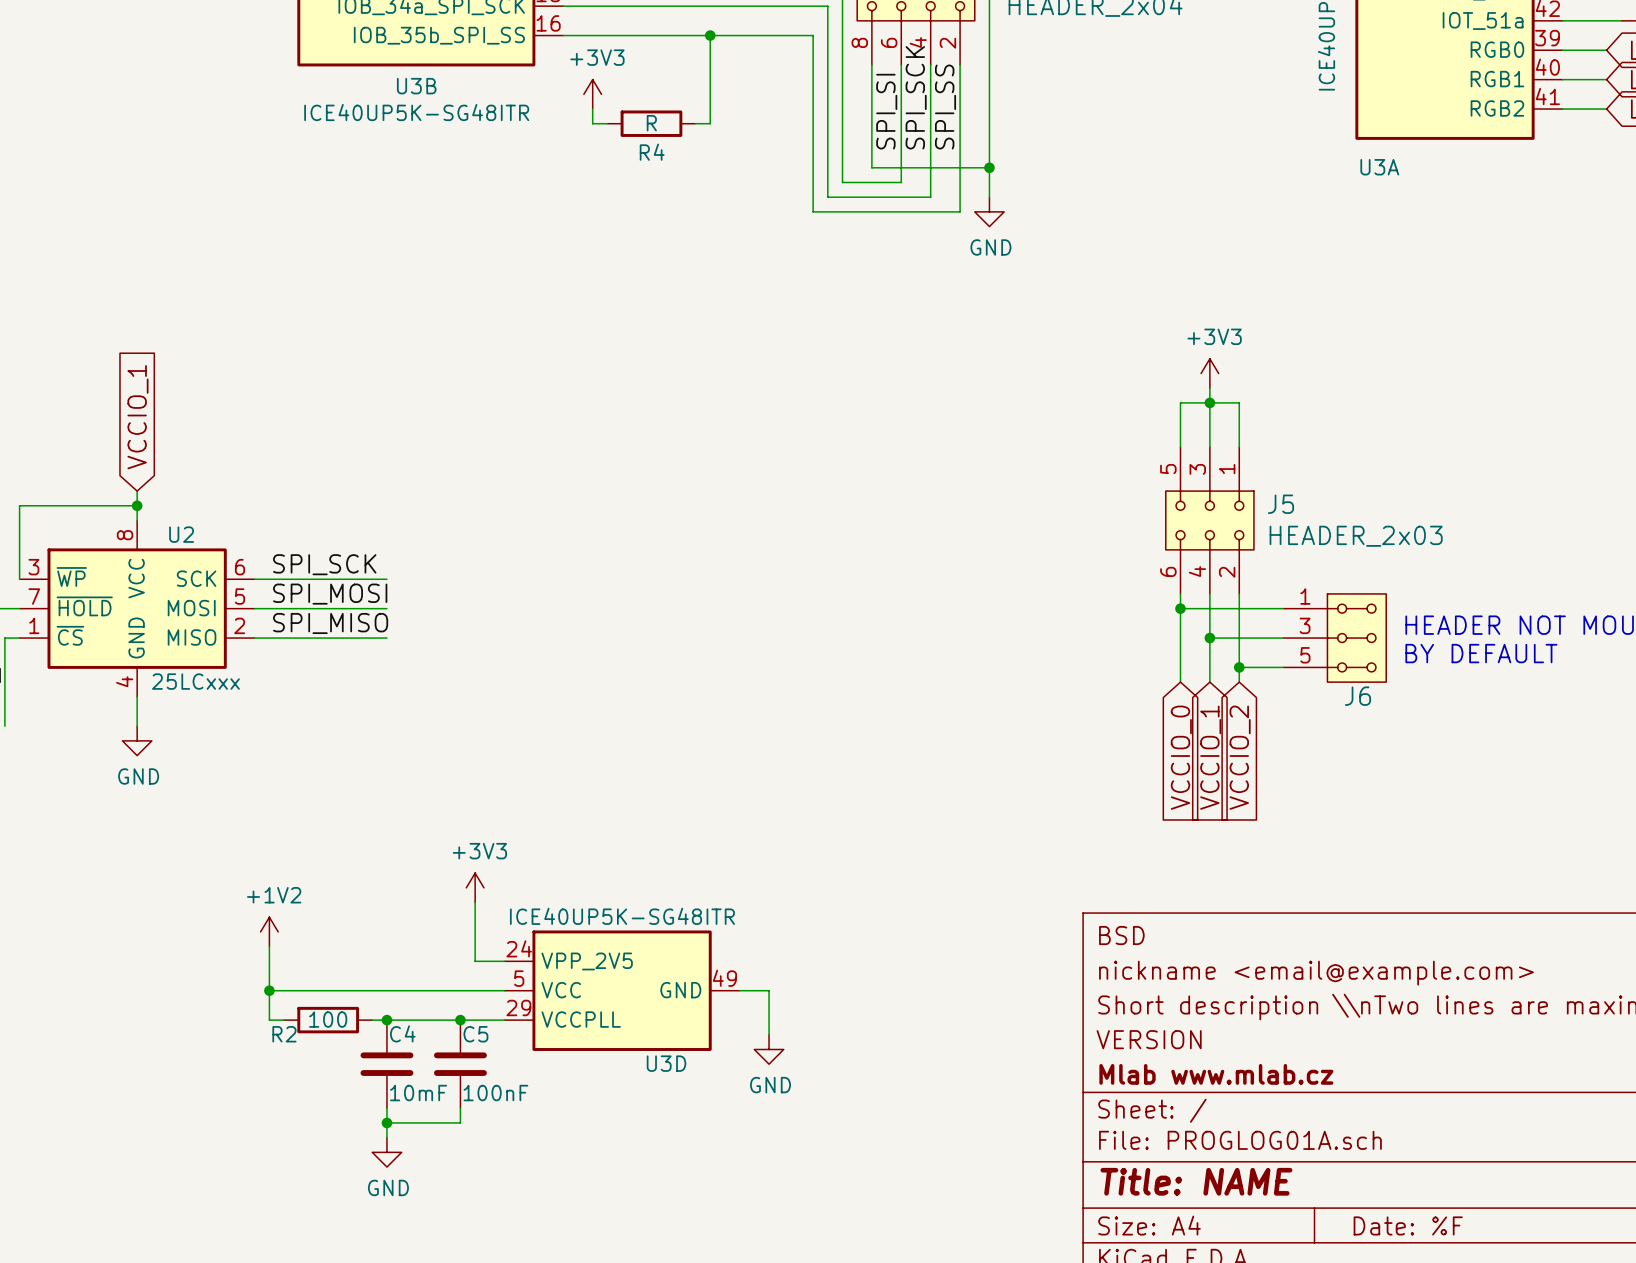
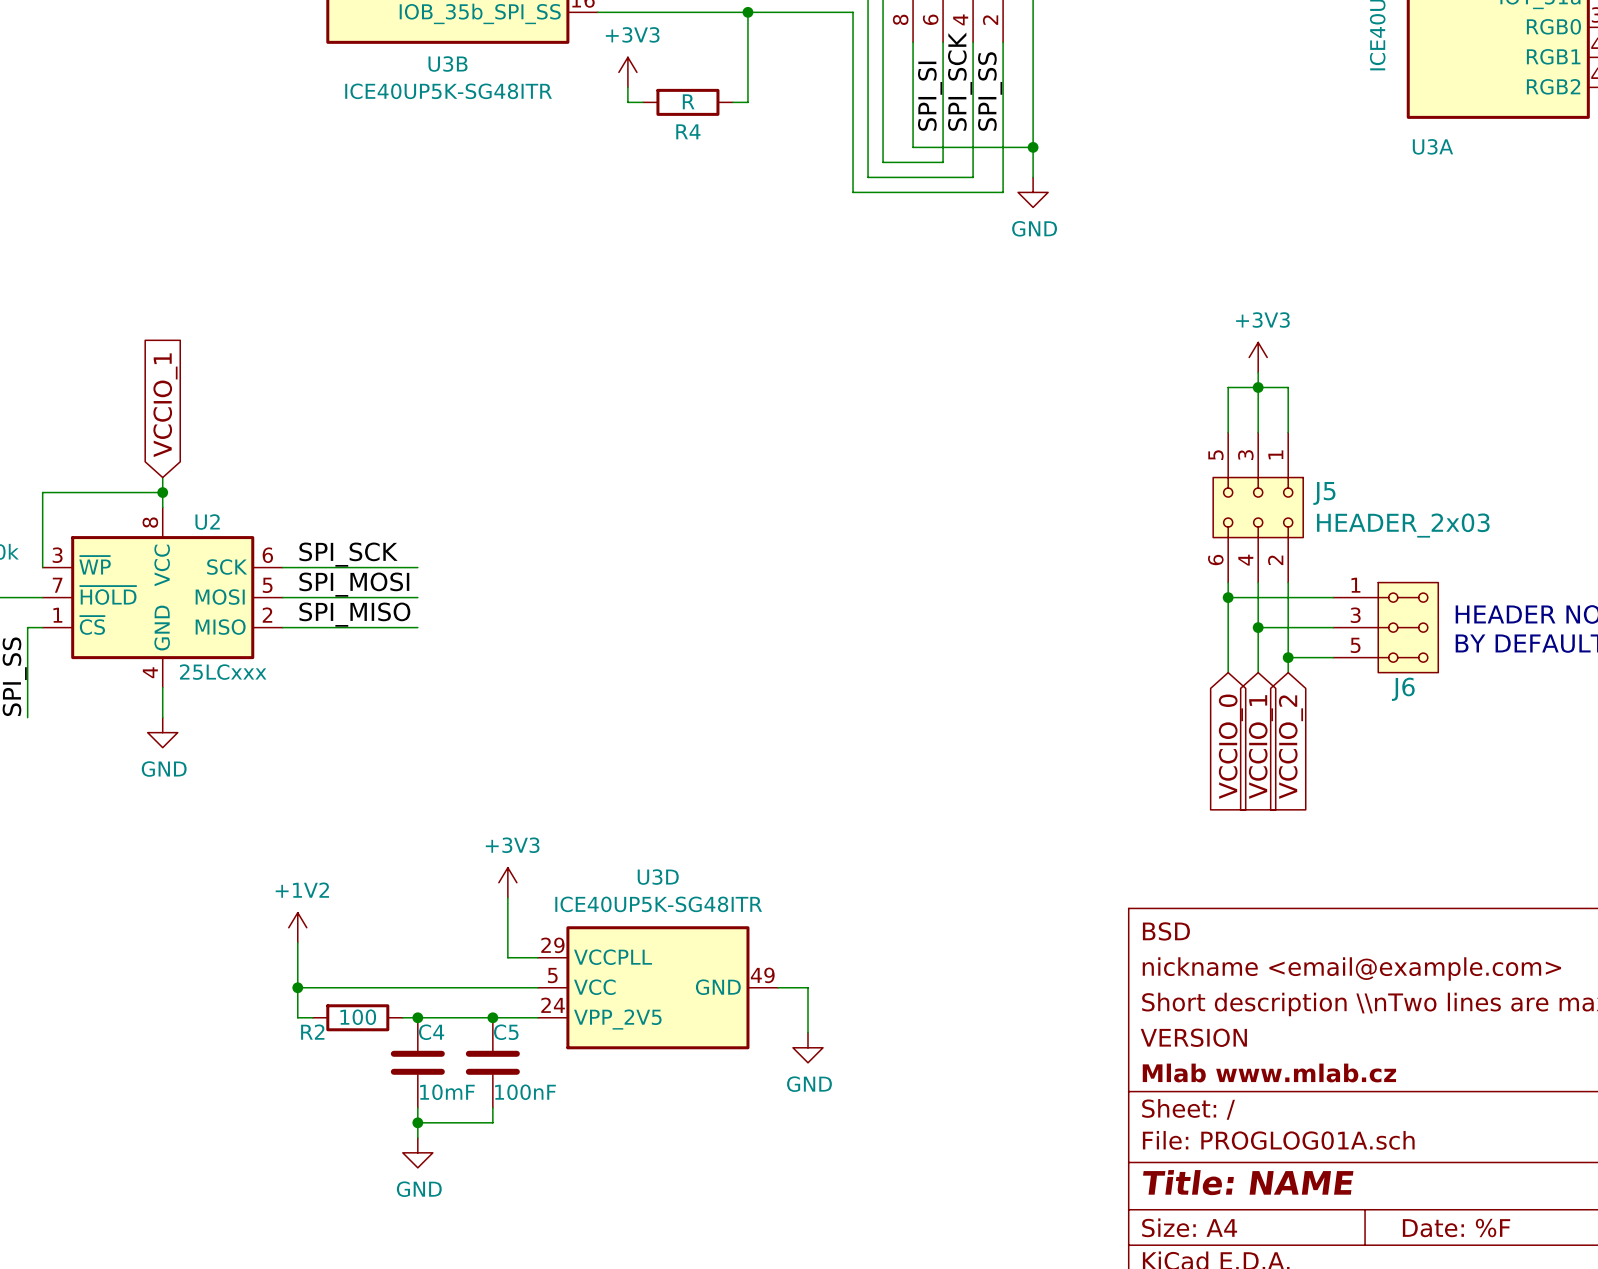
U3D flip: as is (622, 990) -> up-down (657, 987)
U3D name position: U3D (666, 1063) -> U3D (658, 877)

